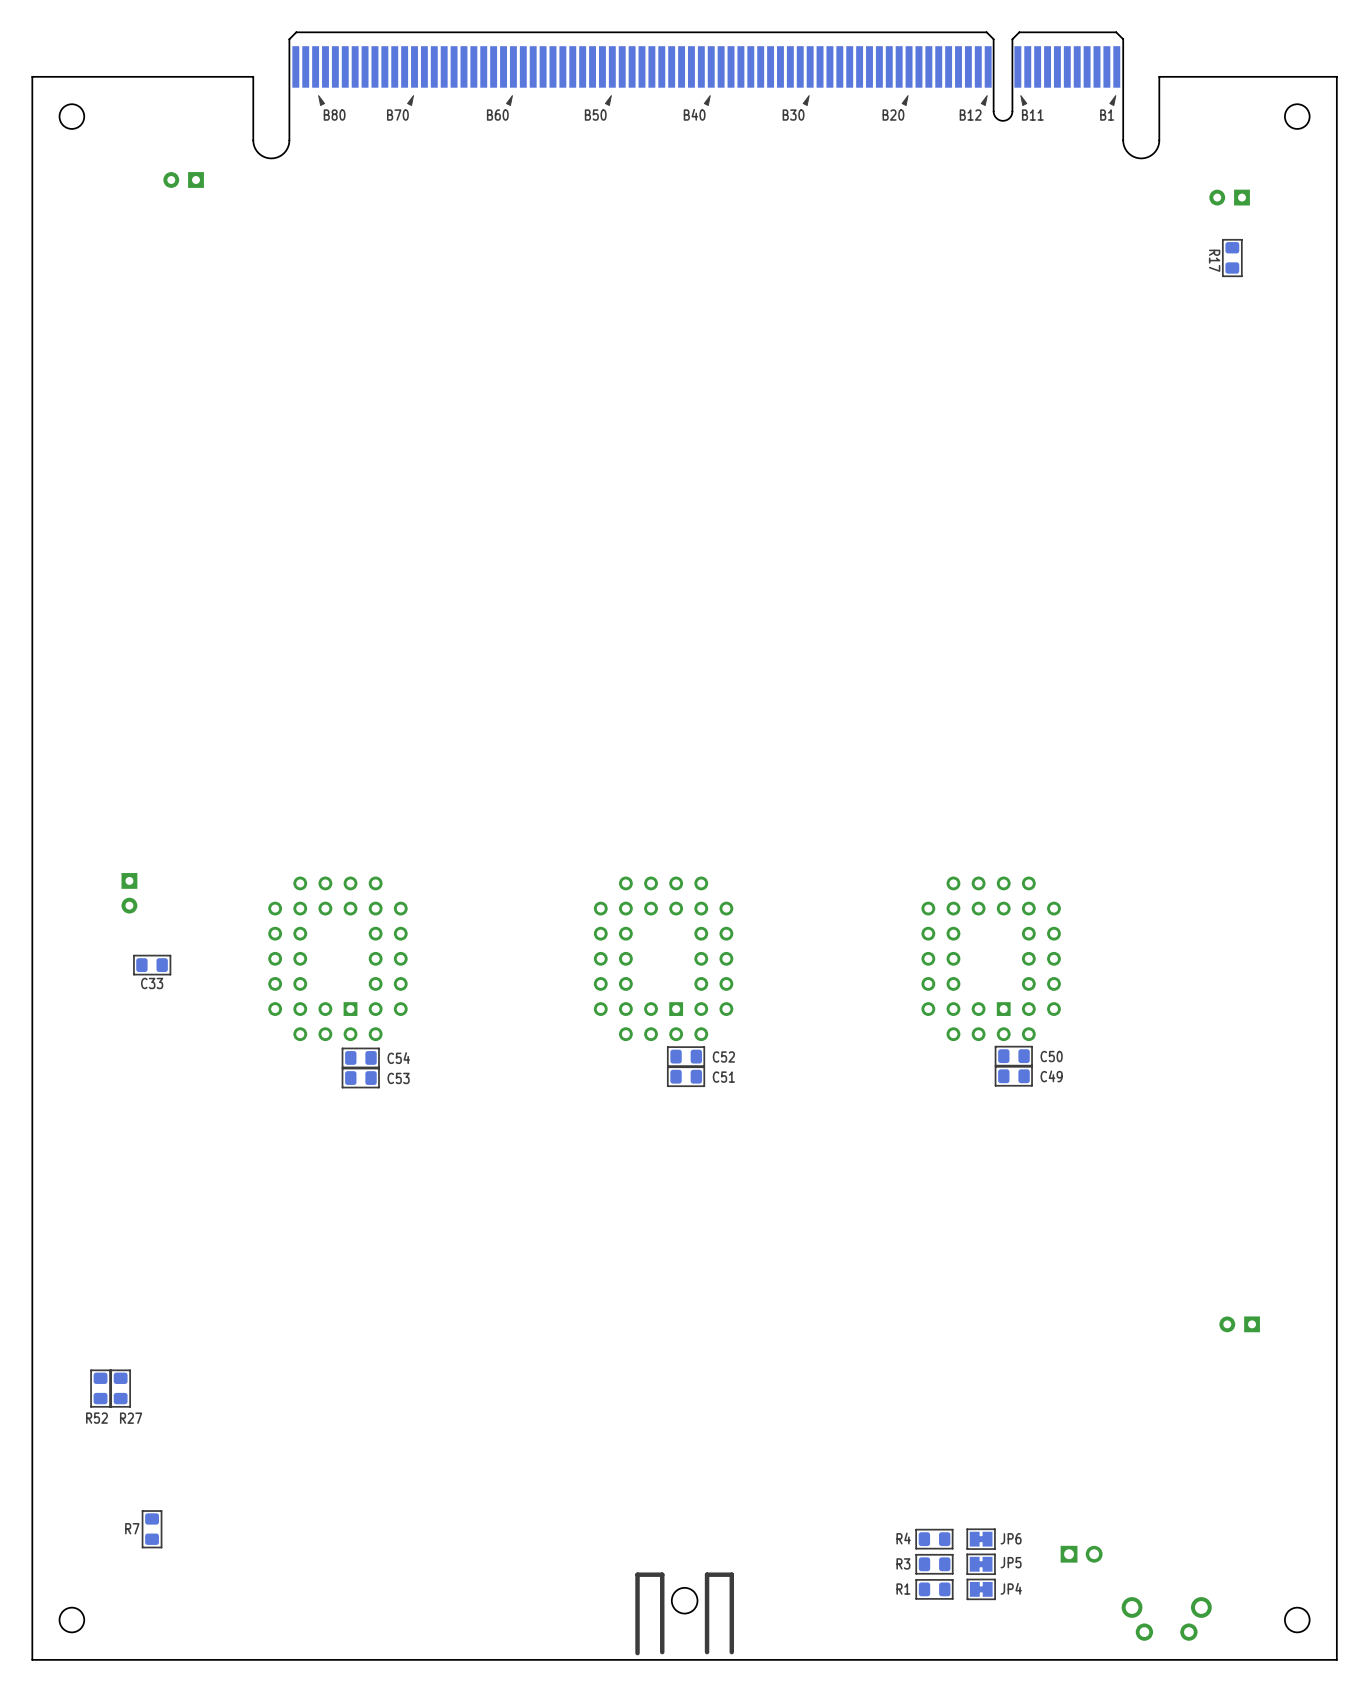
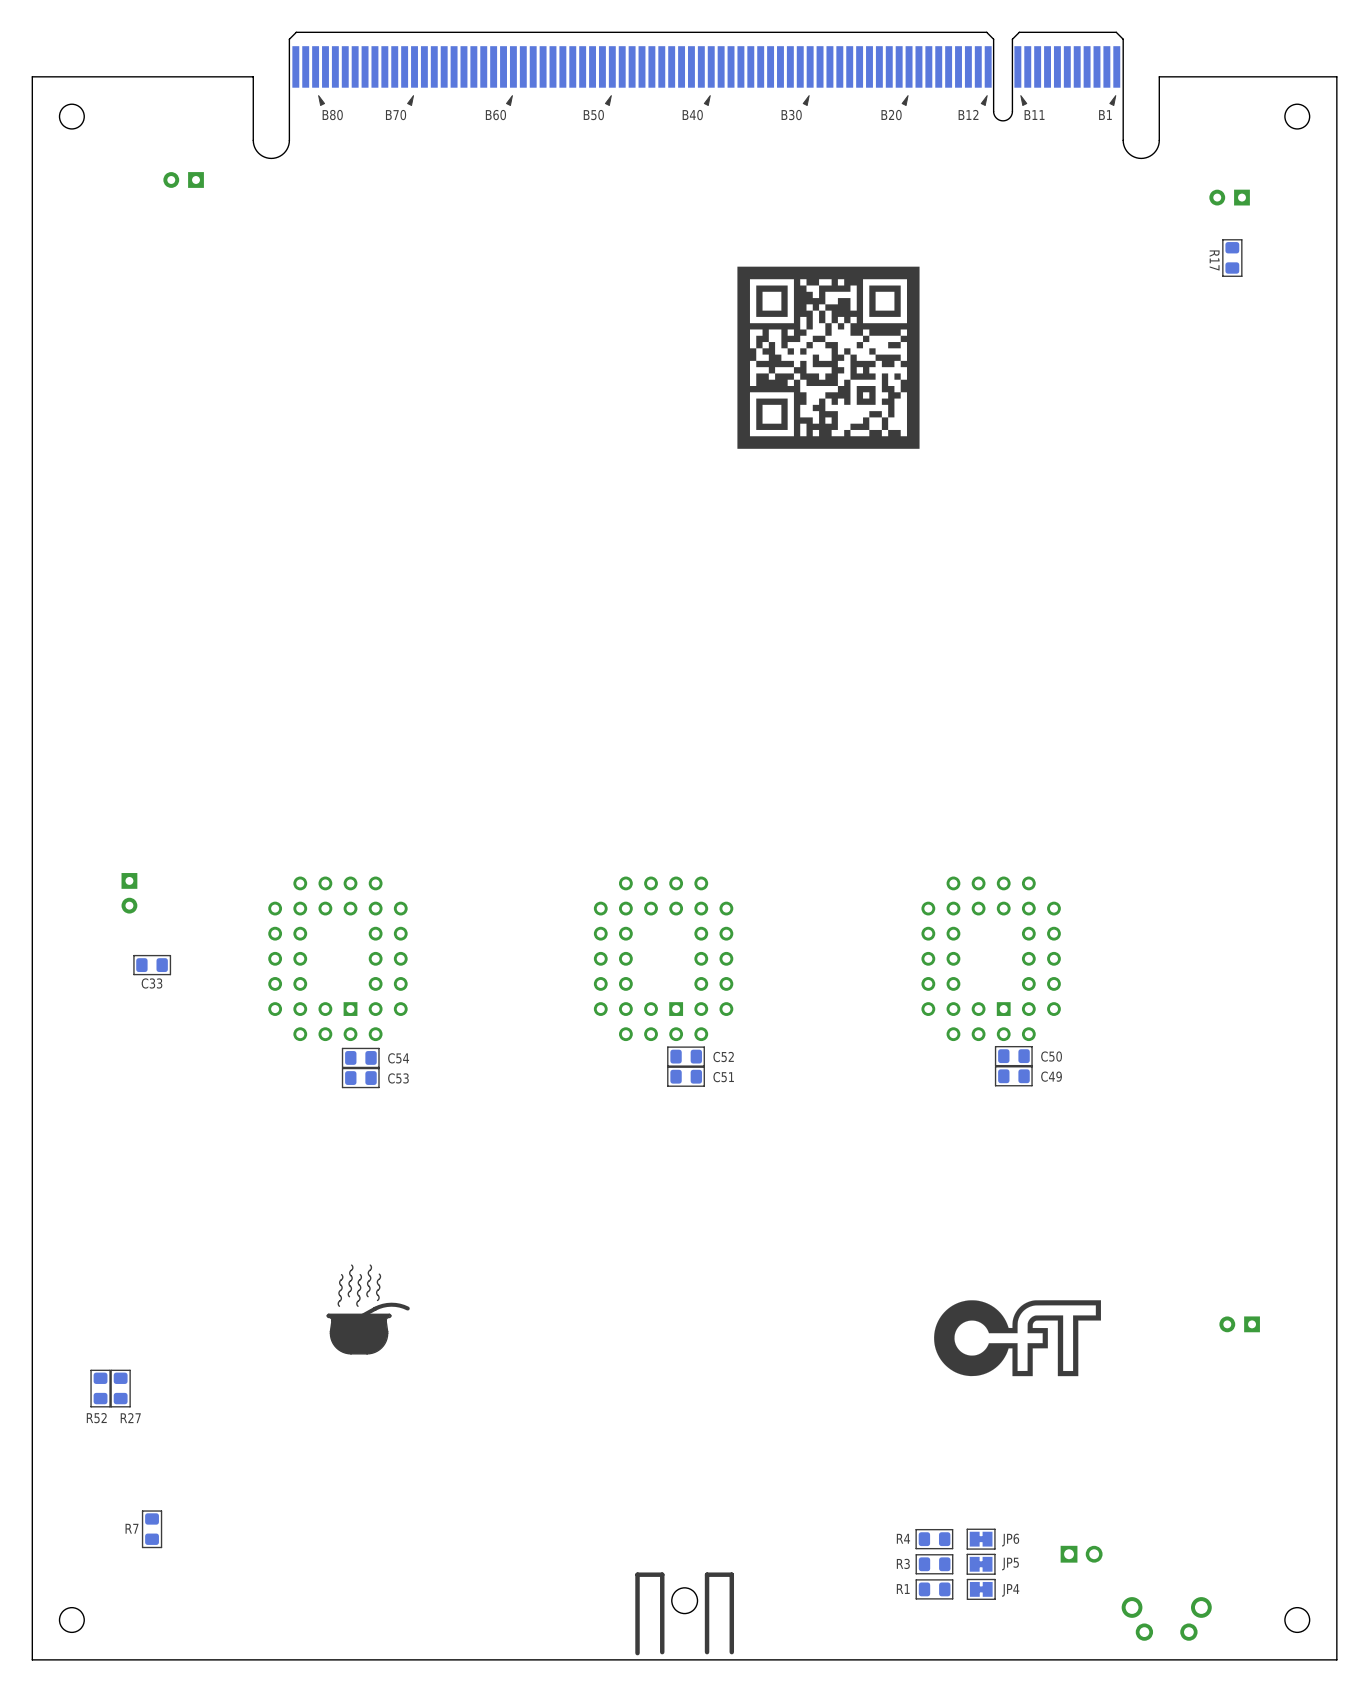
drawing: none -> [737, 266, 920, 449]
drawing: none -> [326, 1264, 410, 1355]
drawing: none -> [934, 1300, 1101, 1377]

